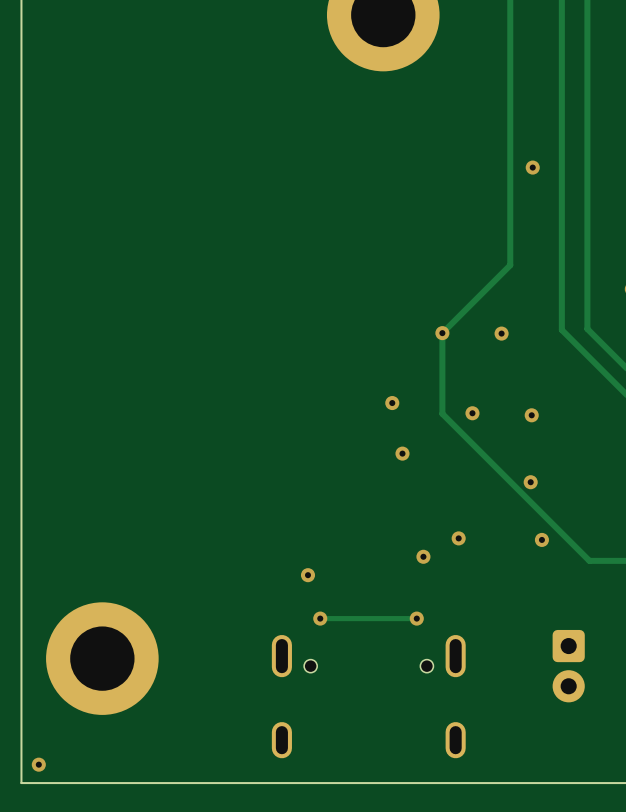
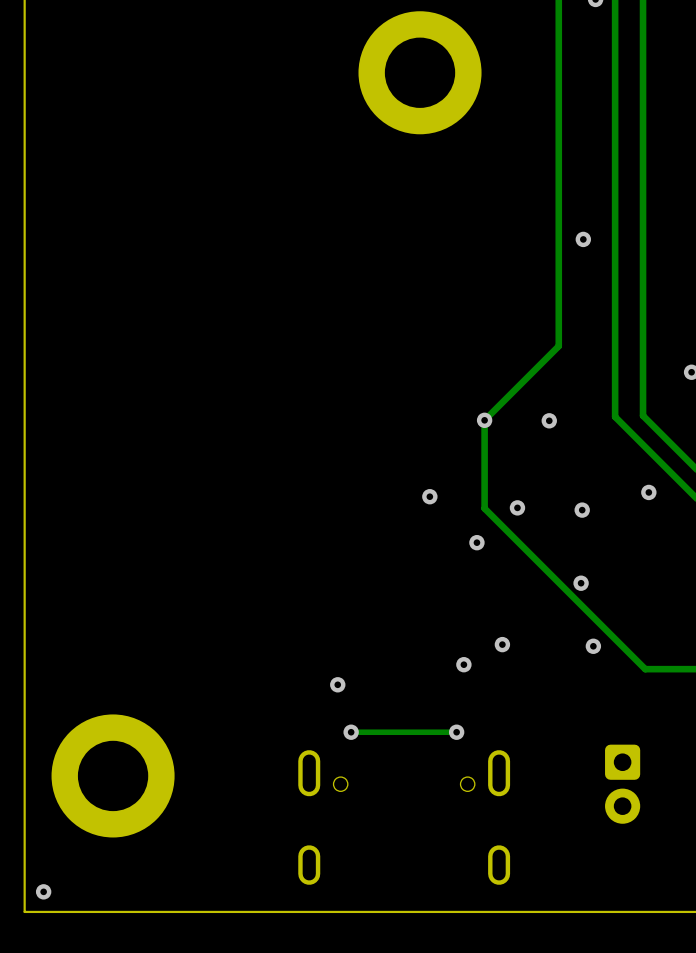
via: none -> (648, 492)
via position: (402, 453) -> (476, 542)

